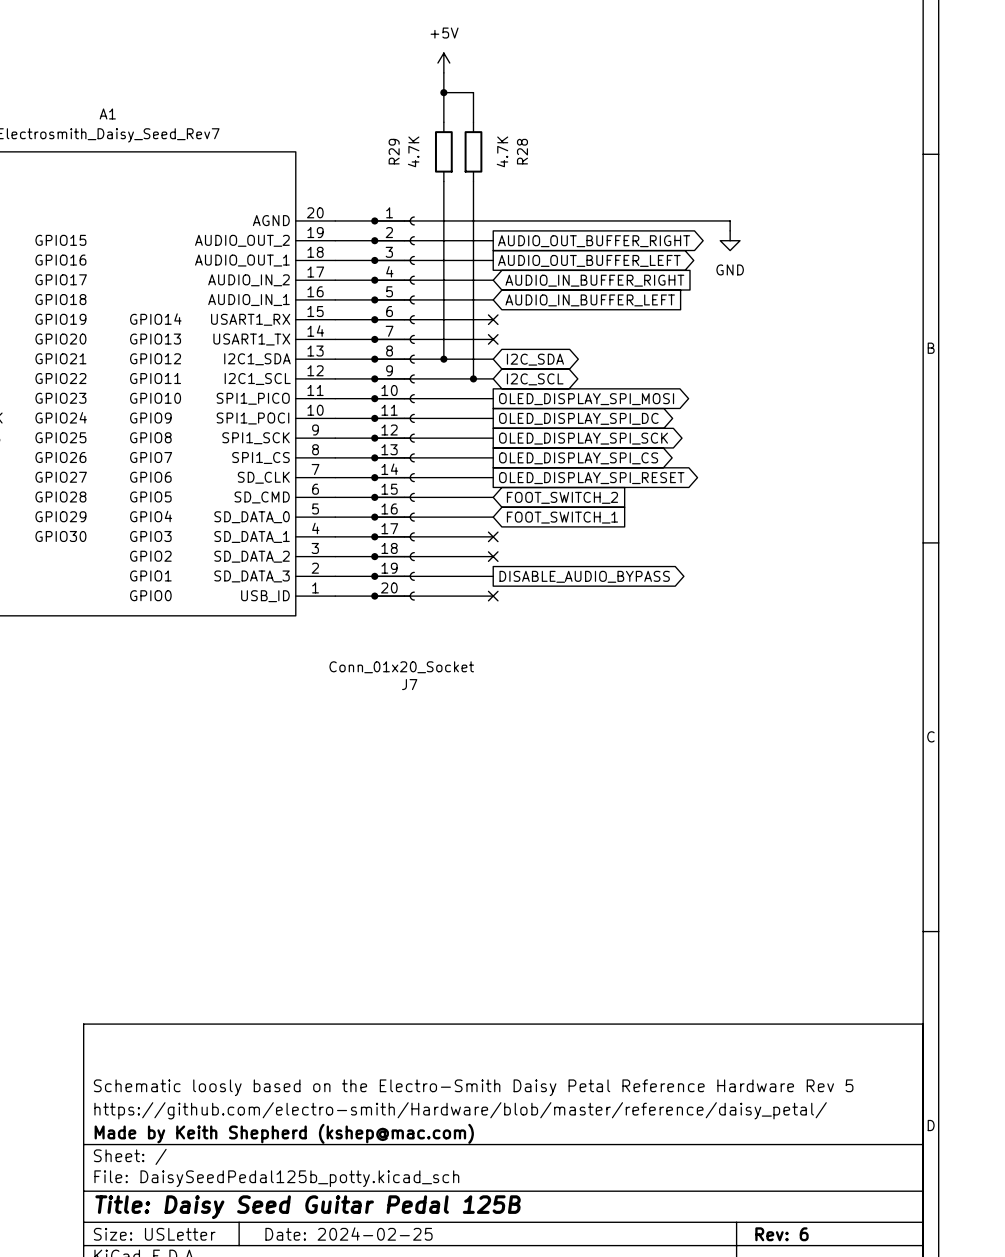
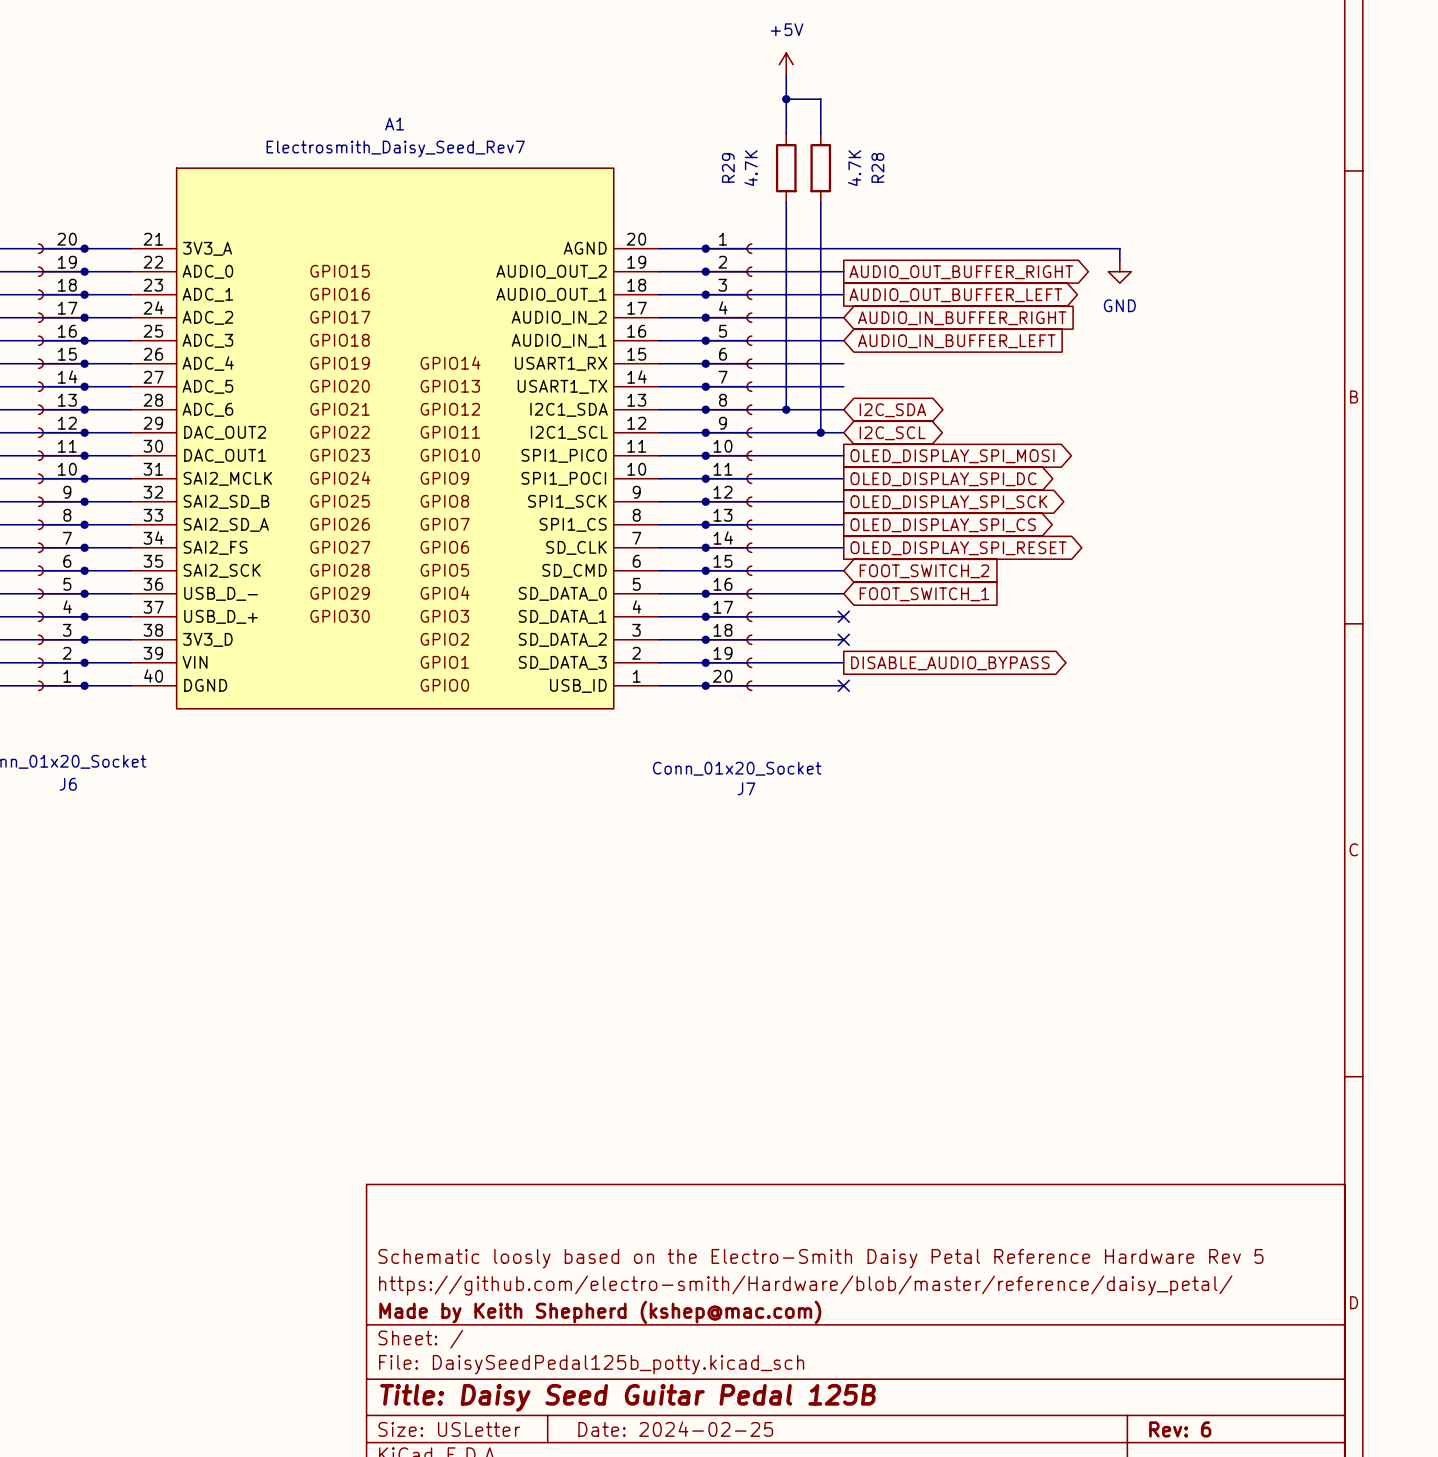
no-connect mark: (493, 319) -> none
no-connect mark: (493, 339) -> none

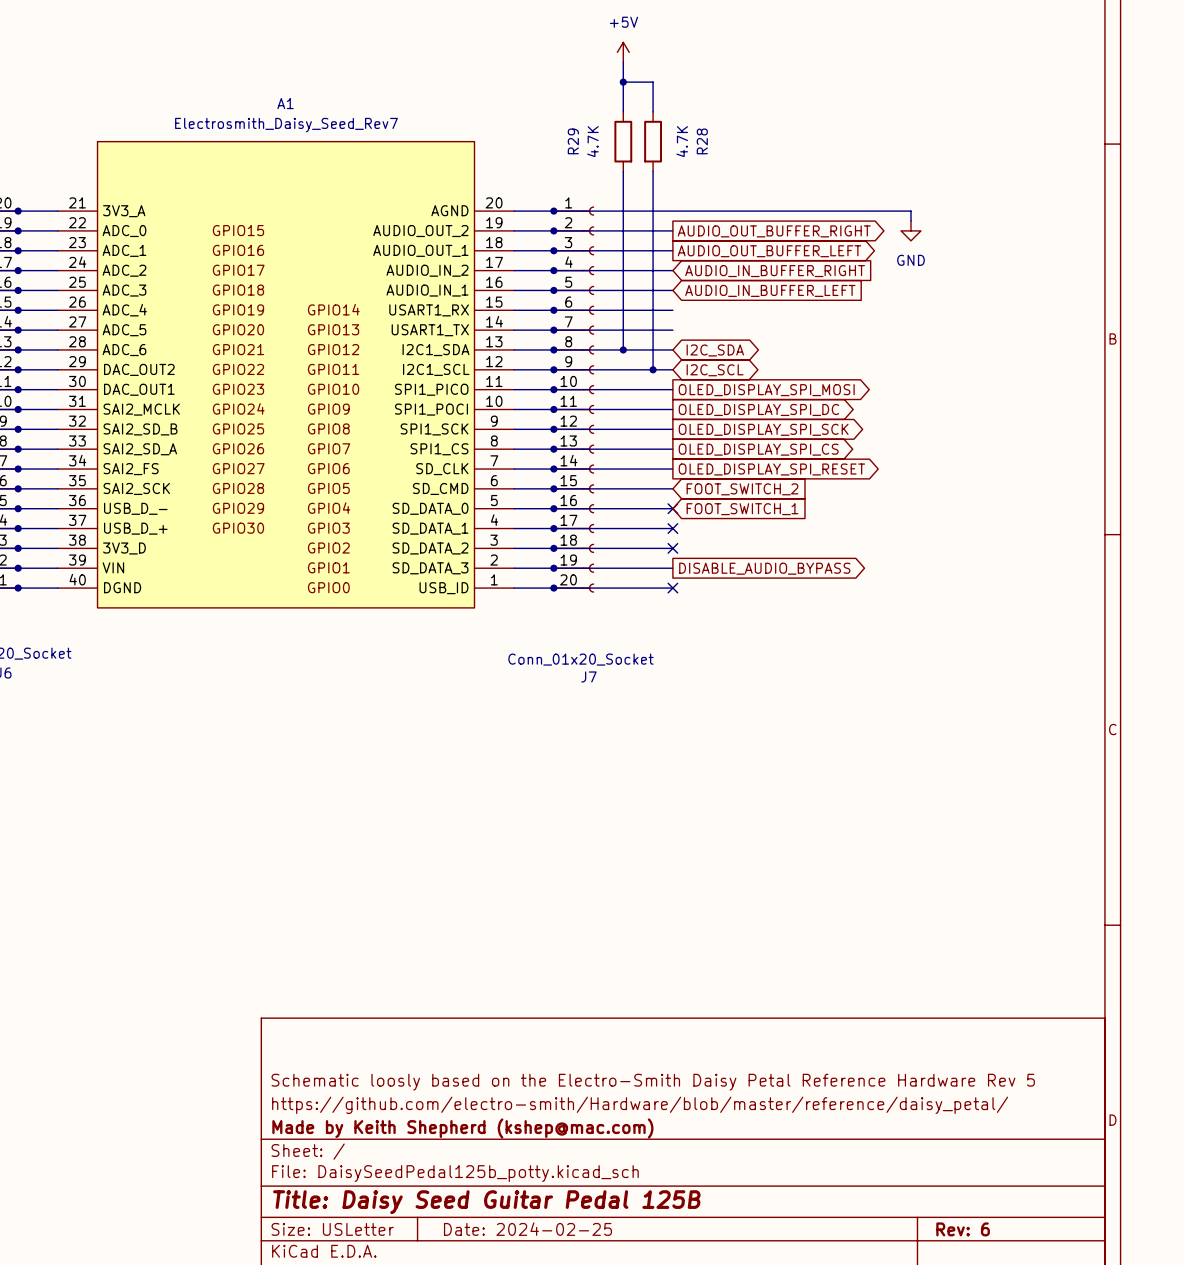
no-connect mark: none -> (672, 508)

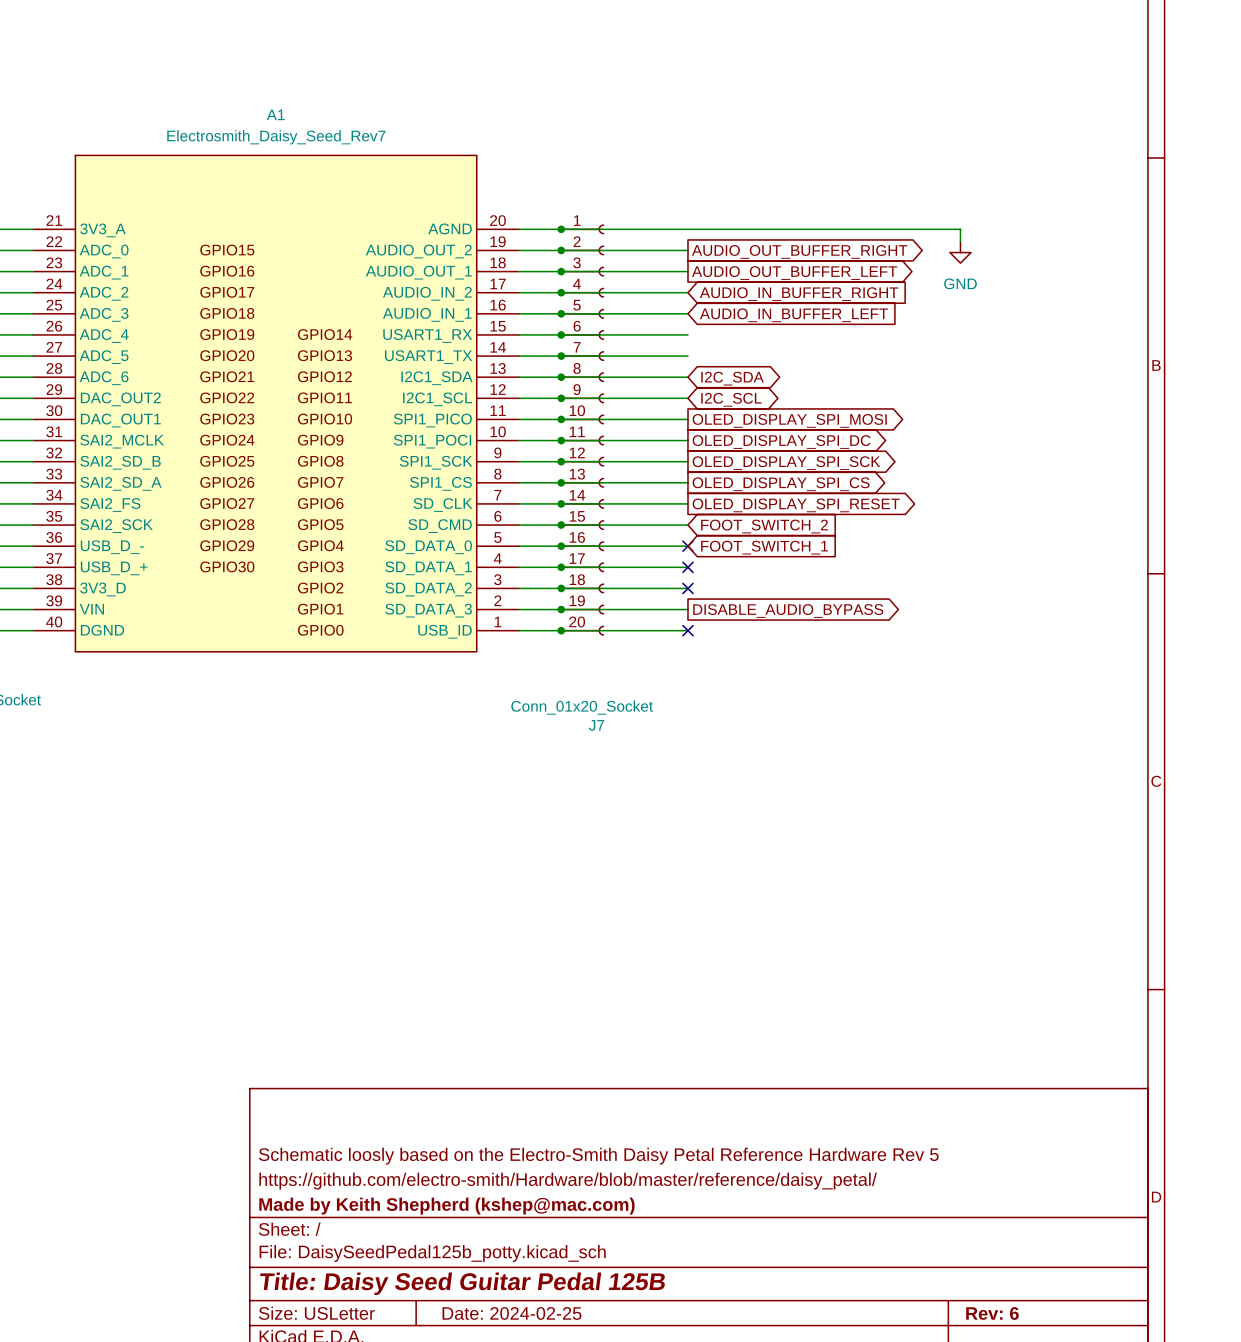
power symbol: +5V (623, 52) -> none
wire: (623, 62) (623, 111) -> none
wire: (623, 82) (653, 82) (653, 111) -> none
junction: (623, 82) -> none
R29: 4.7K (623, 141) -> none
R28: 4.7K (653, 141) -> none
wire: (623, 171) (623, 349) -> none
wire: (653, 171) (653, 369) -> none
wire: (910, 211) (910, 221) -> (941, 229) (960, 229) (960, 242)
power symbol position: GND (910, 230) -> GND (960, 252)
junction: (623, 349) -> none
junction: (653, 369) -> none

